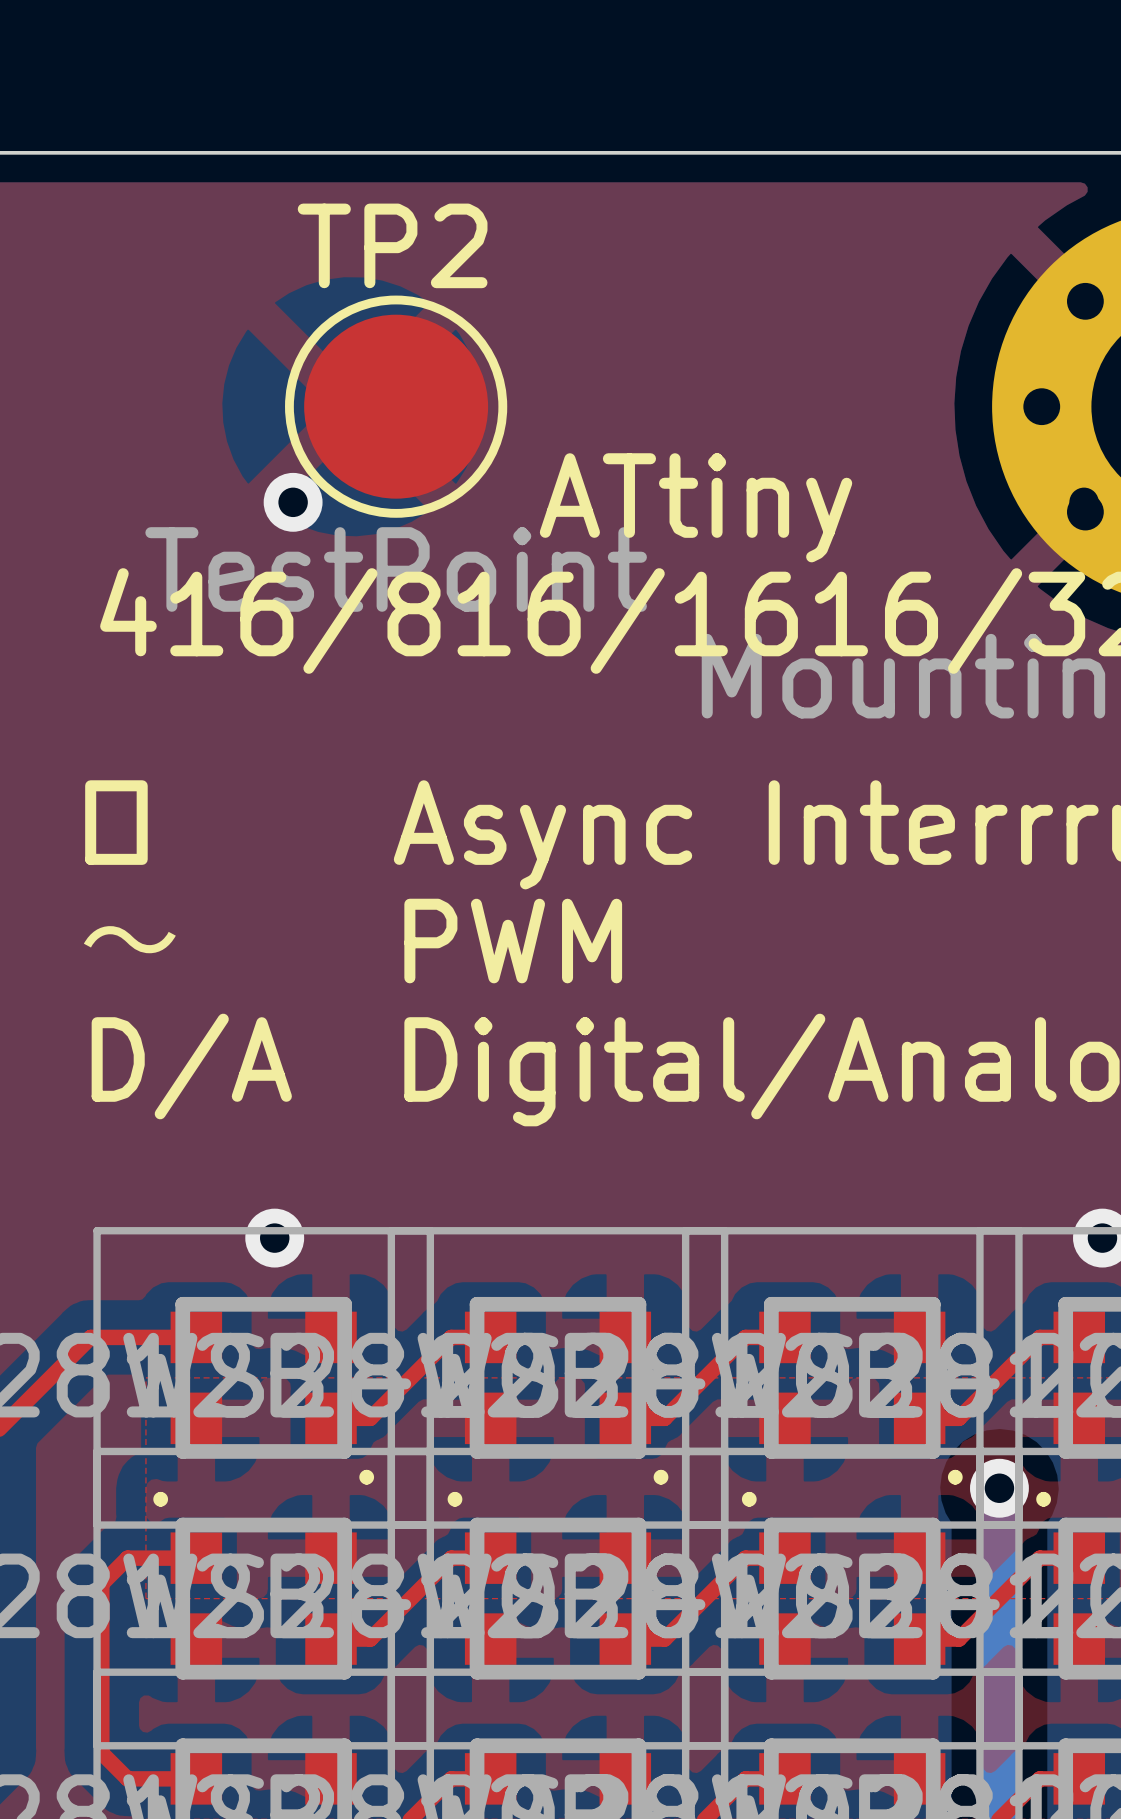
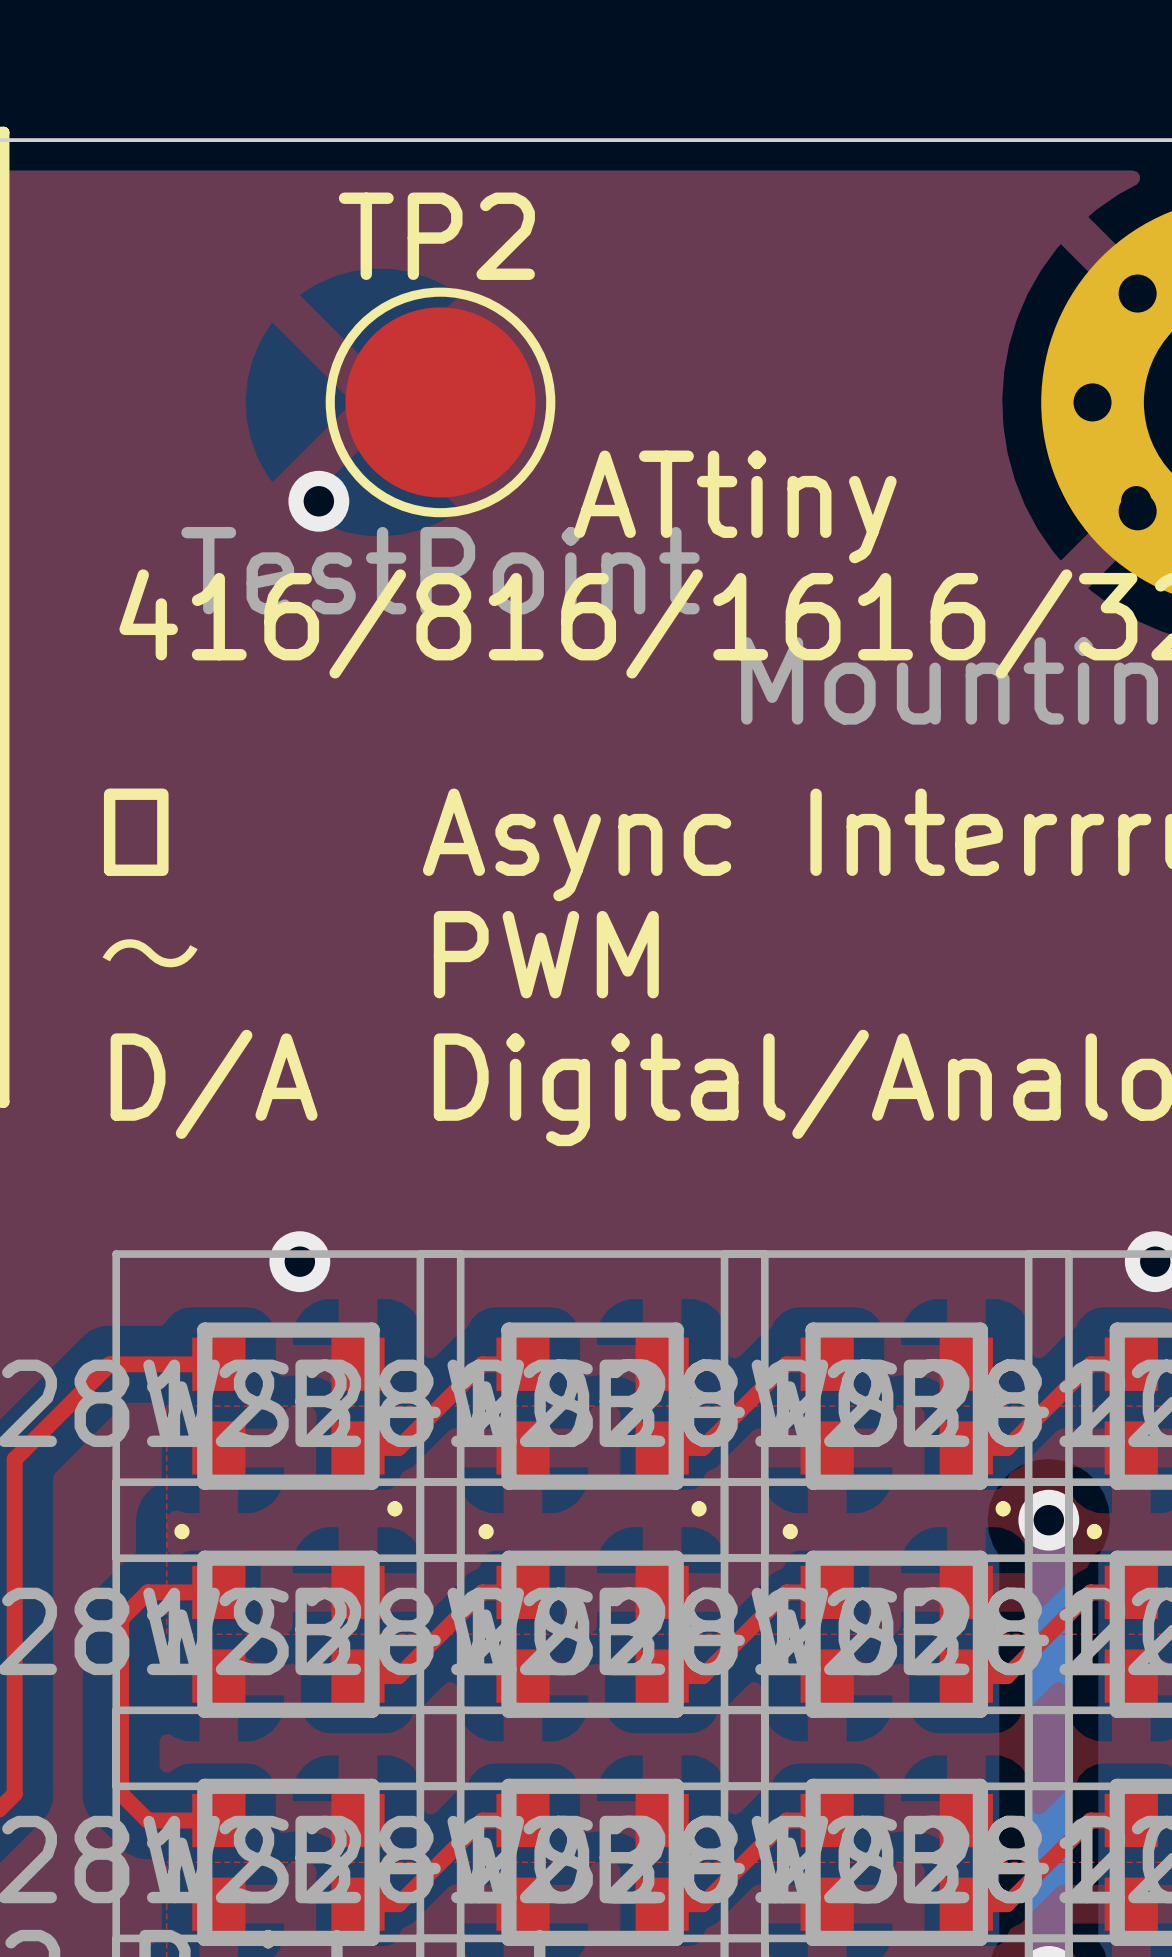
TP2 position: (396, 406) -> (440, 402)

